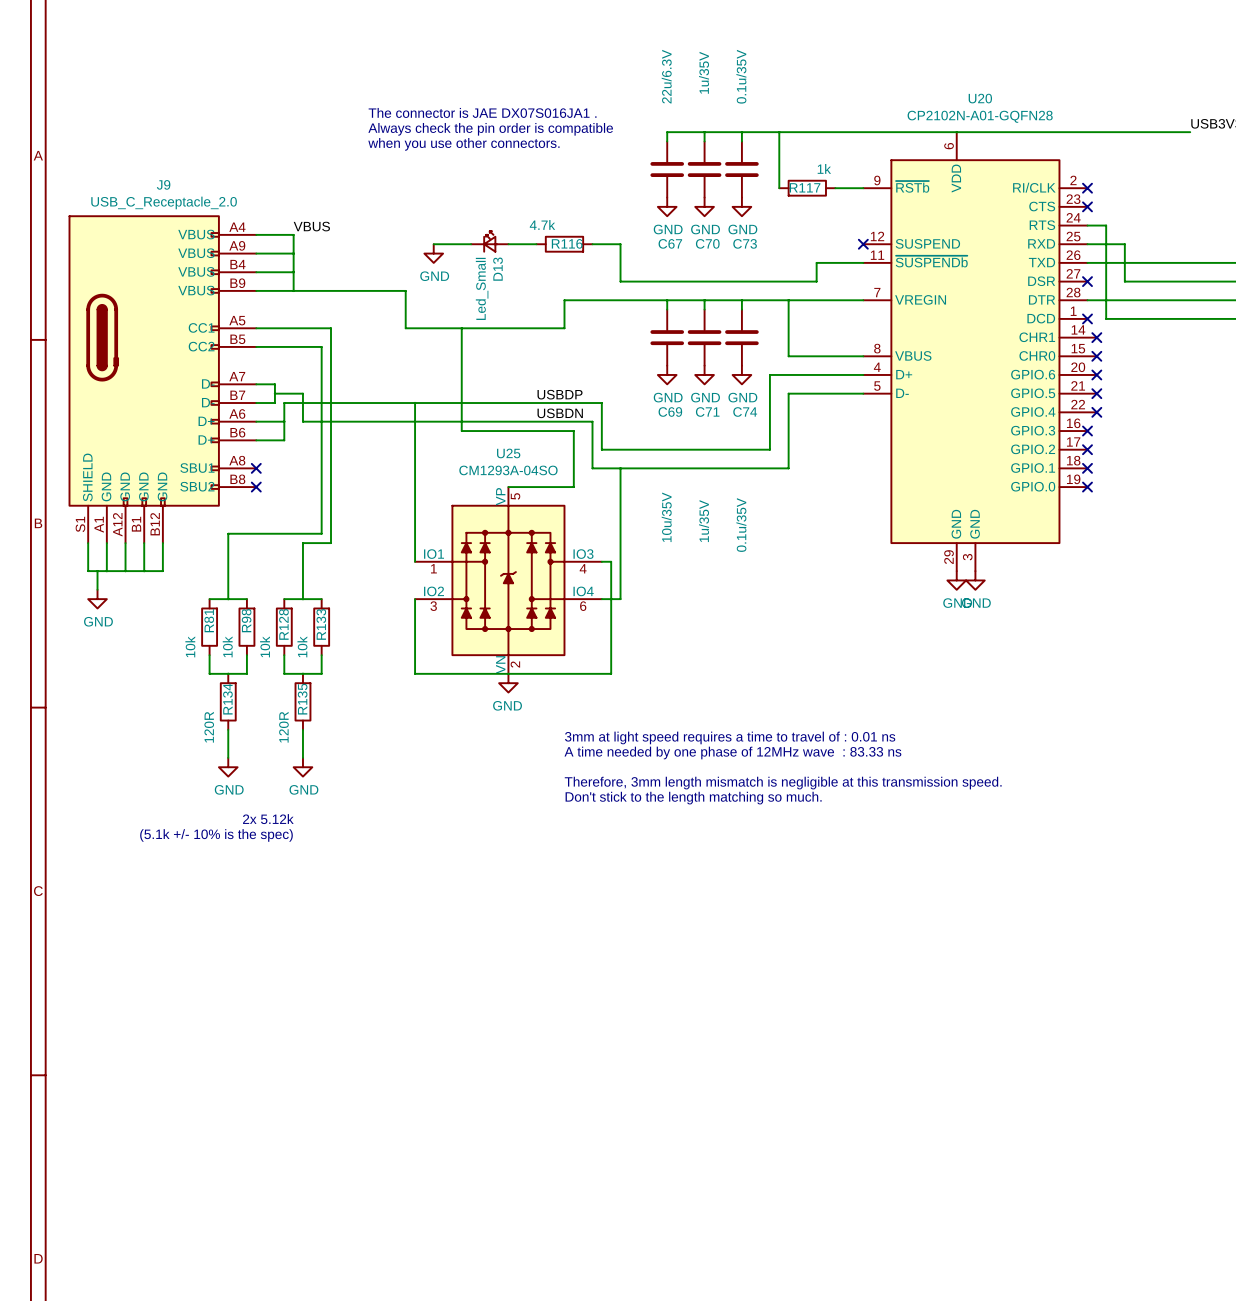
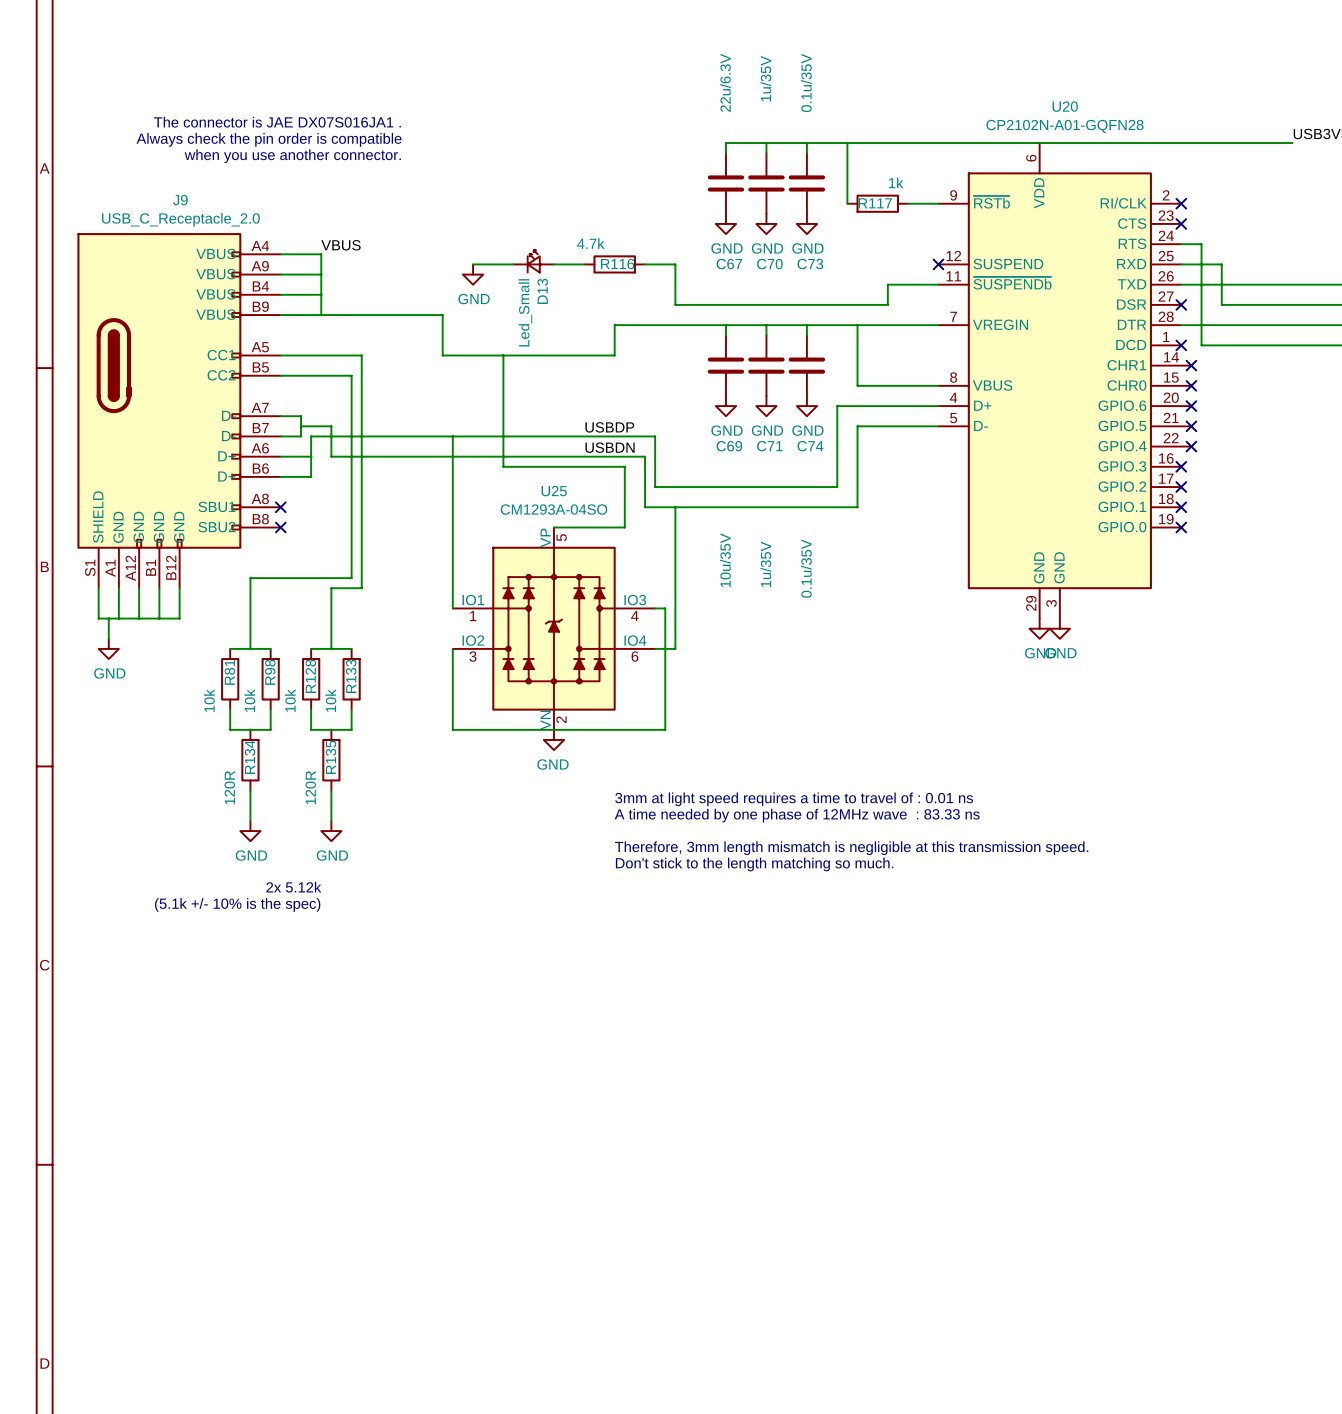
text position: The connector is JAE DX07S016JA1 . (482, 112) -> The connector is JAE DX07S016JA1 . (277, 122)
text position: Always check the pin order is compatible (490, 129) -> Always check the pin order is compatible (269, 139)
text: when you use other connectors. (463, 144) -> when you use another connector. (292, 156)

